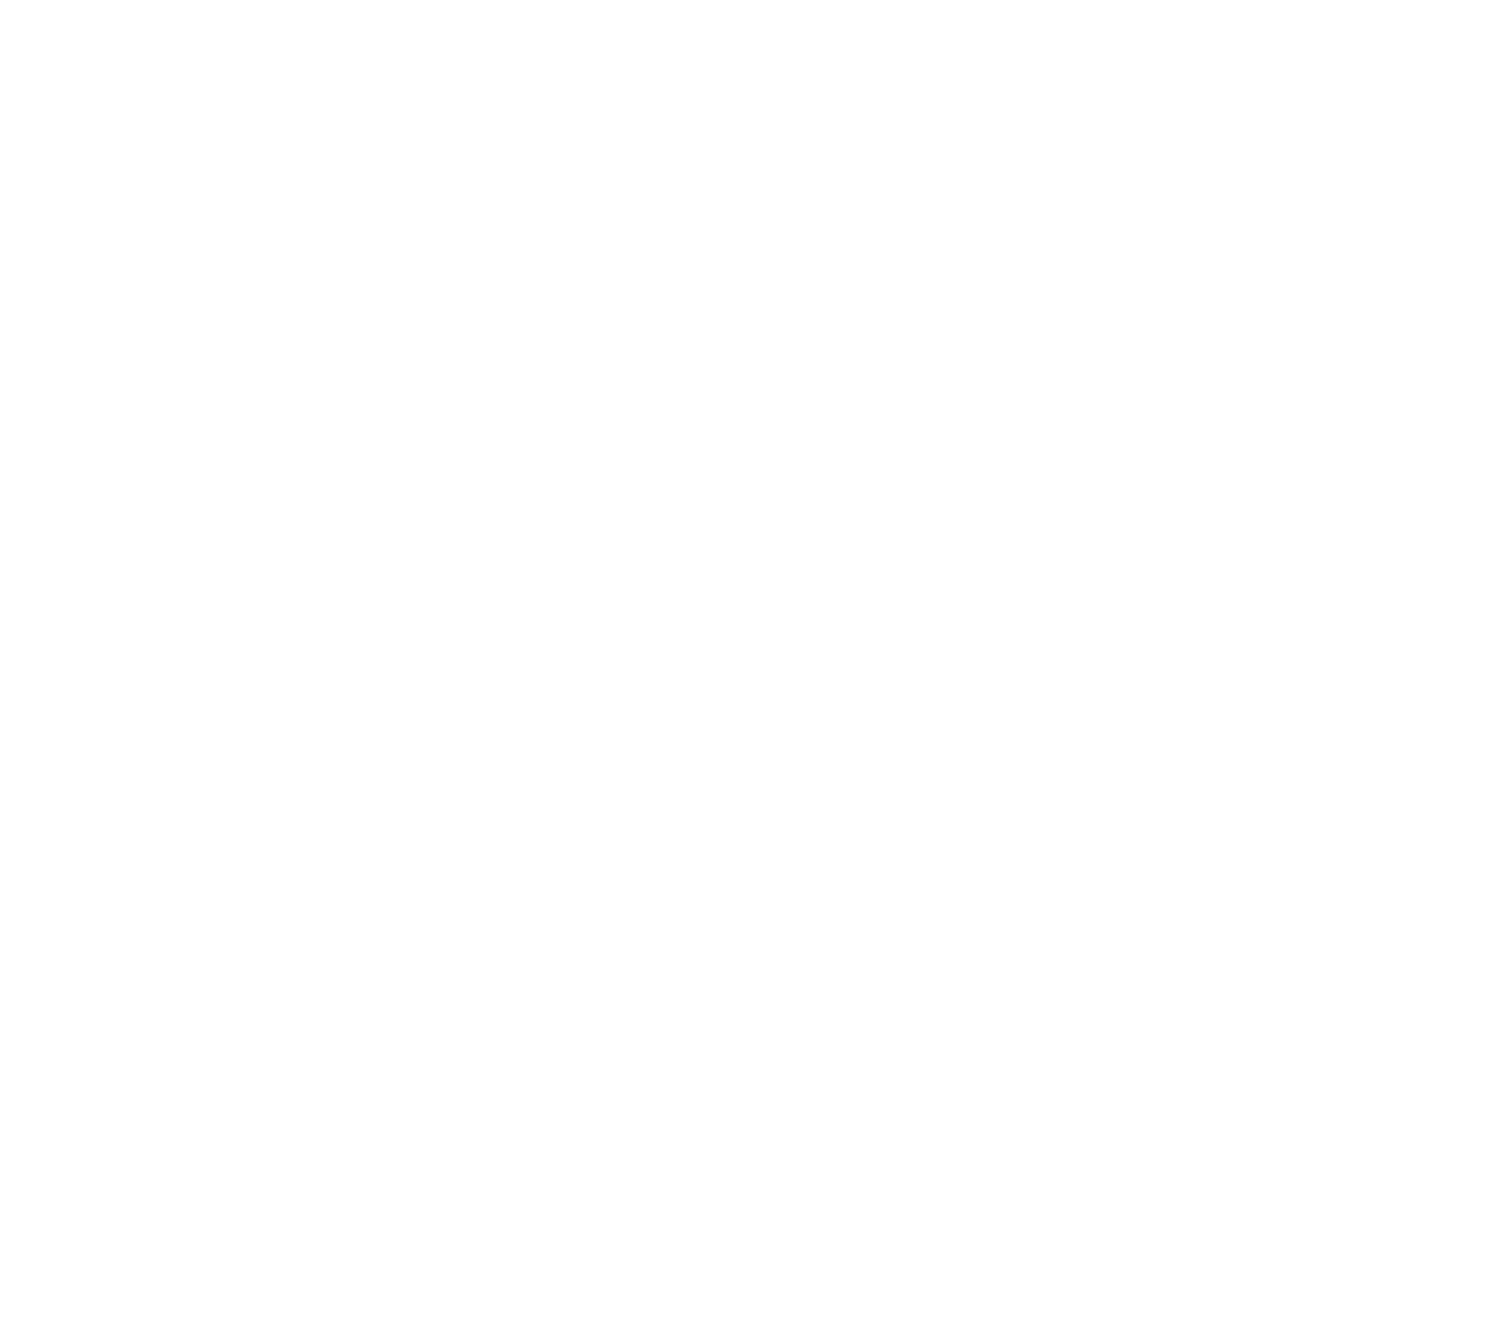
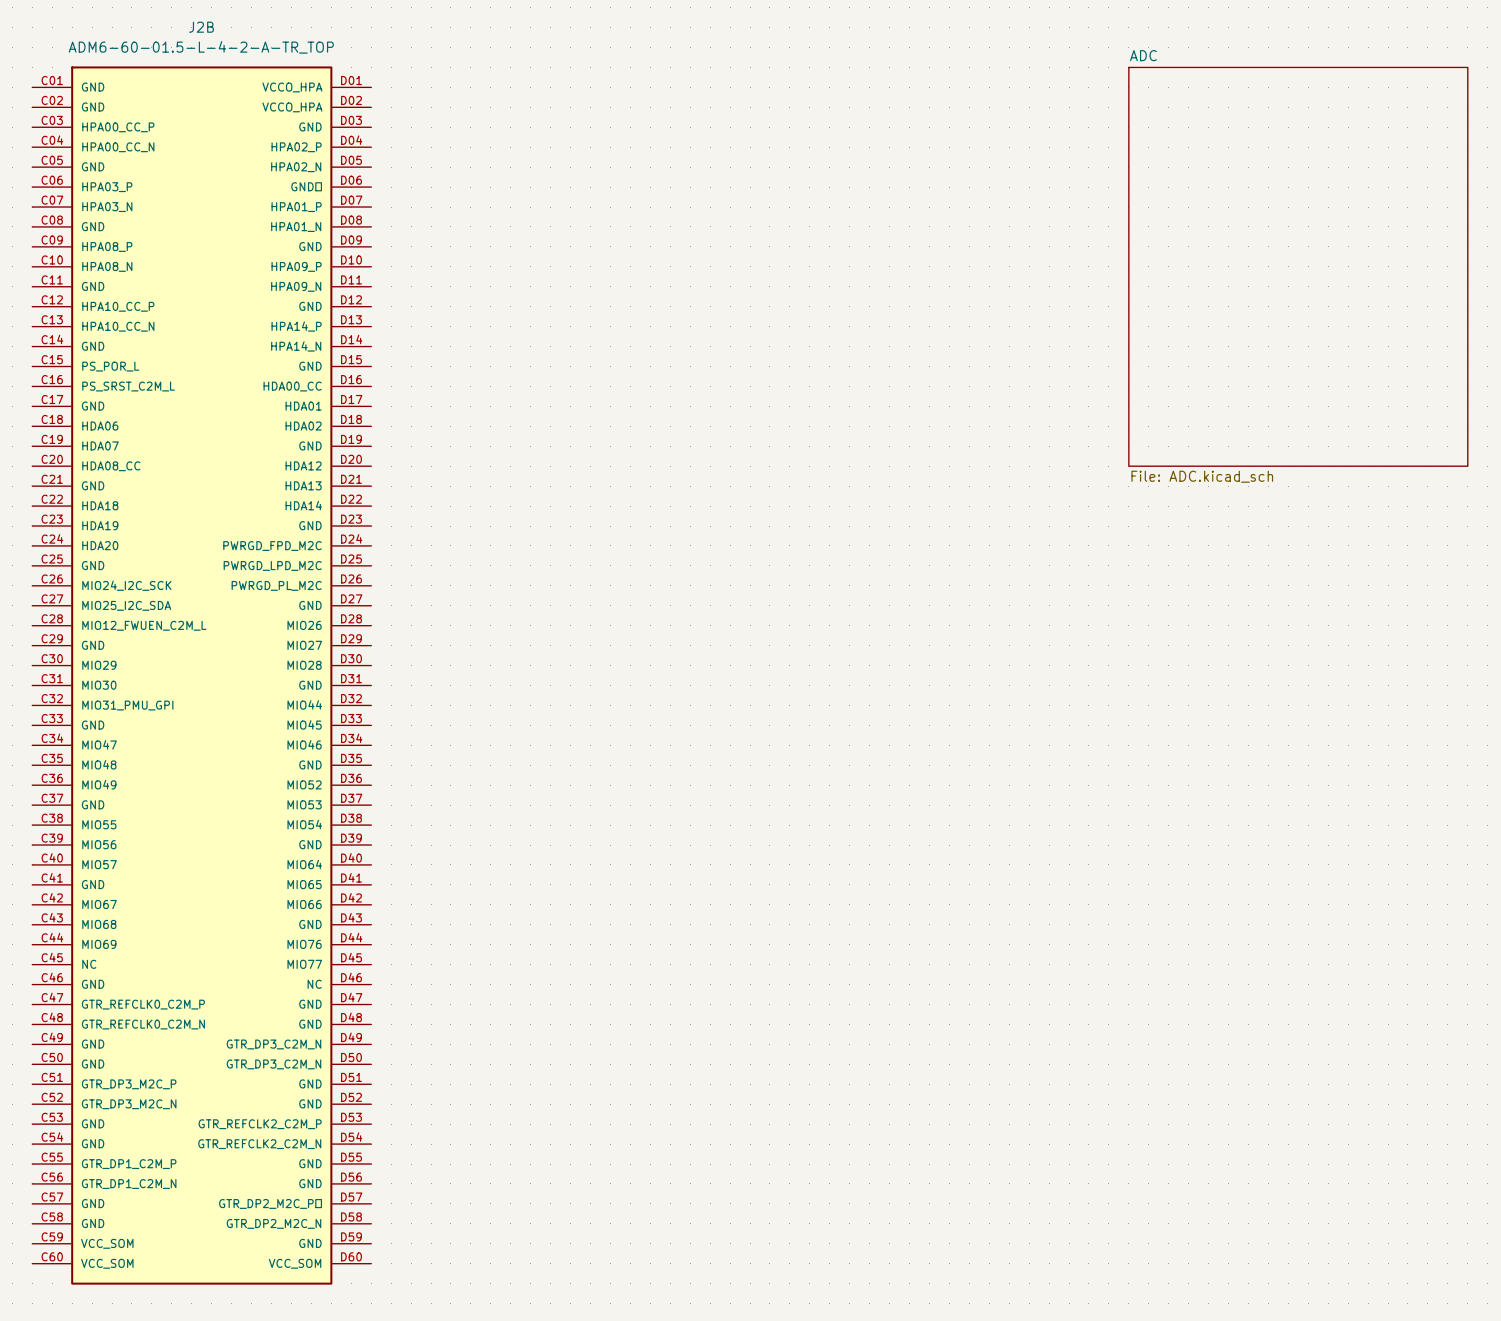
sheet ADC: none -> File: ADC.kicad_sch (1298, 266)
J2B: none -> ADM6-60-01.5-L-4-2-A-TR_TOP (201, 675)

